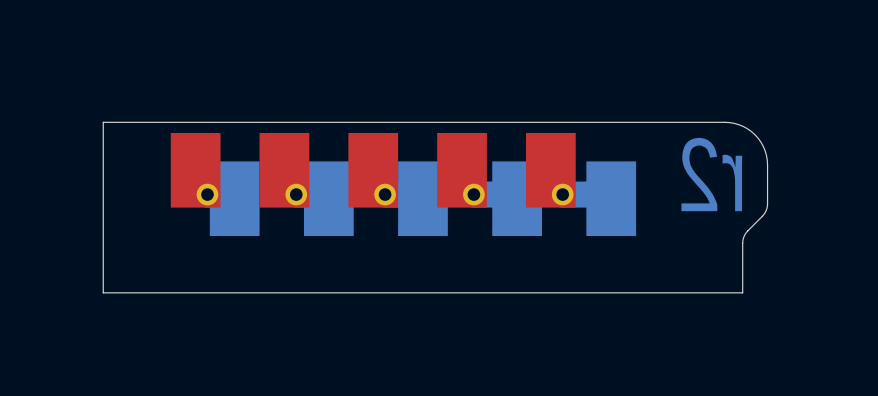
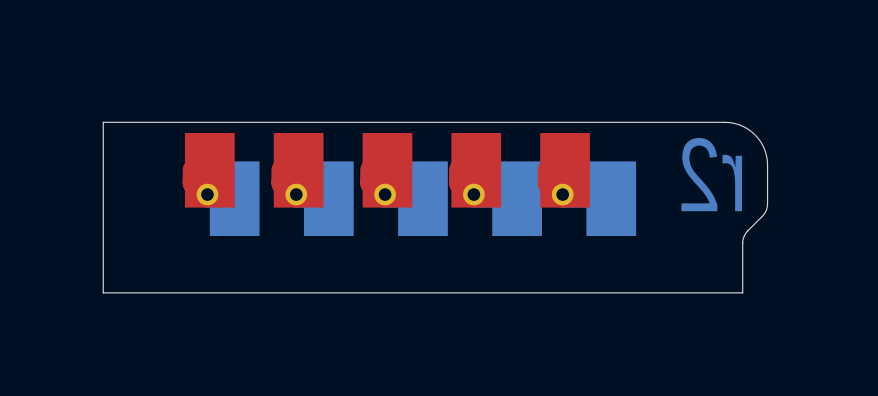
part position: (195, 170) -> (209, 170)
part position: (284, 170) -> (298, 170)
part position: (373, 170) -> (387, 170)
part position: (462, 170) -> (476, 170)
part position: (550, 170) -> (565, 170)

